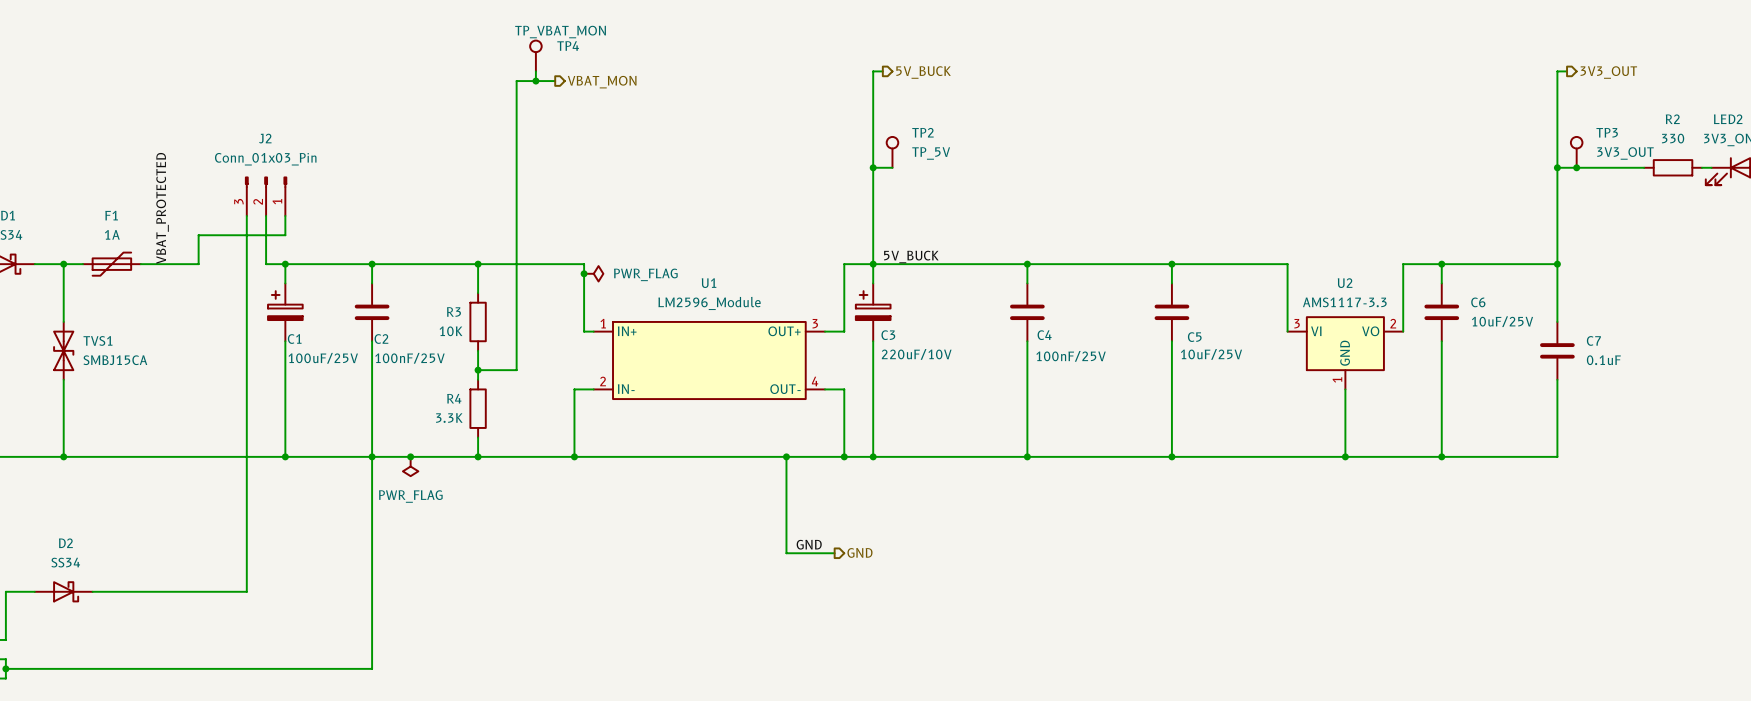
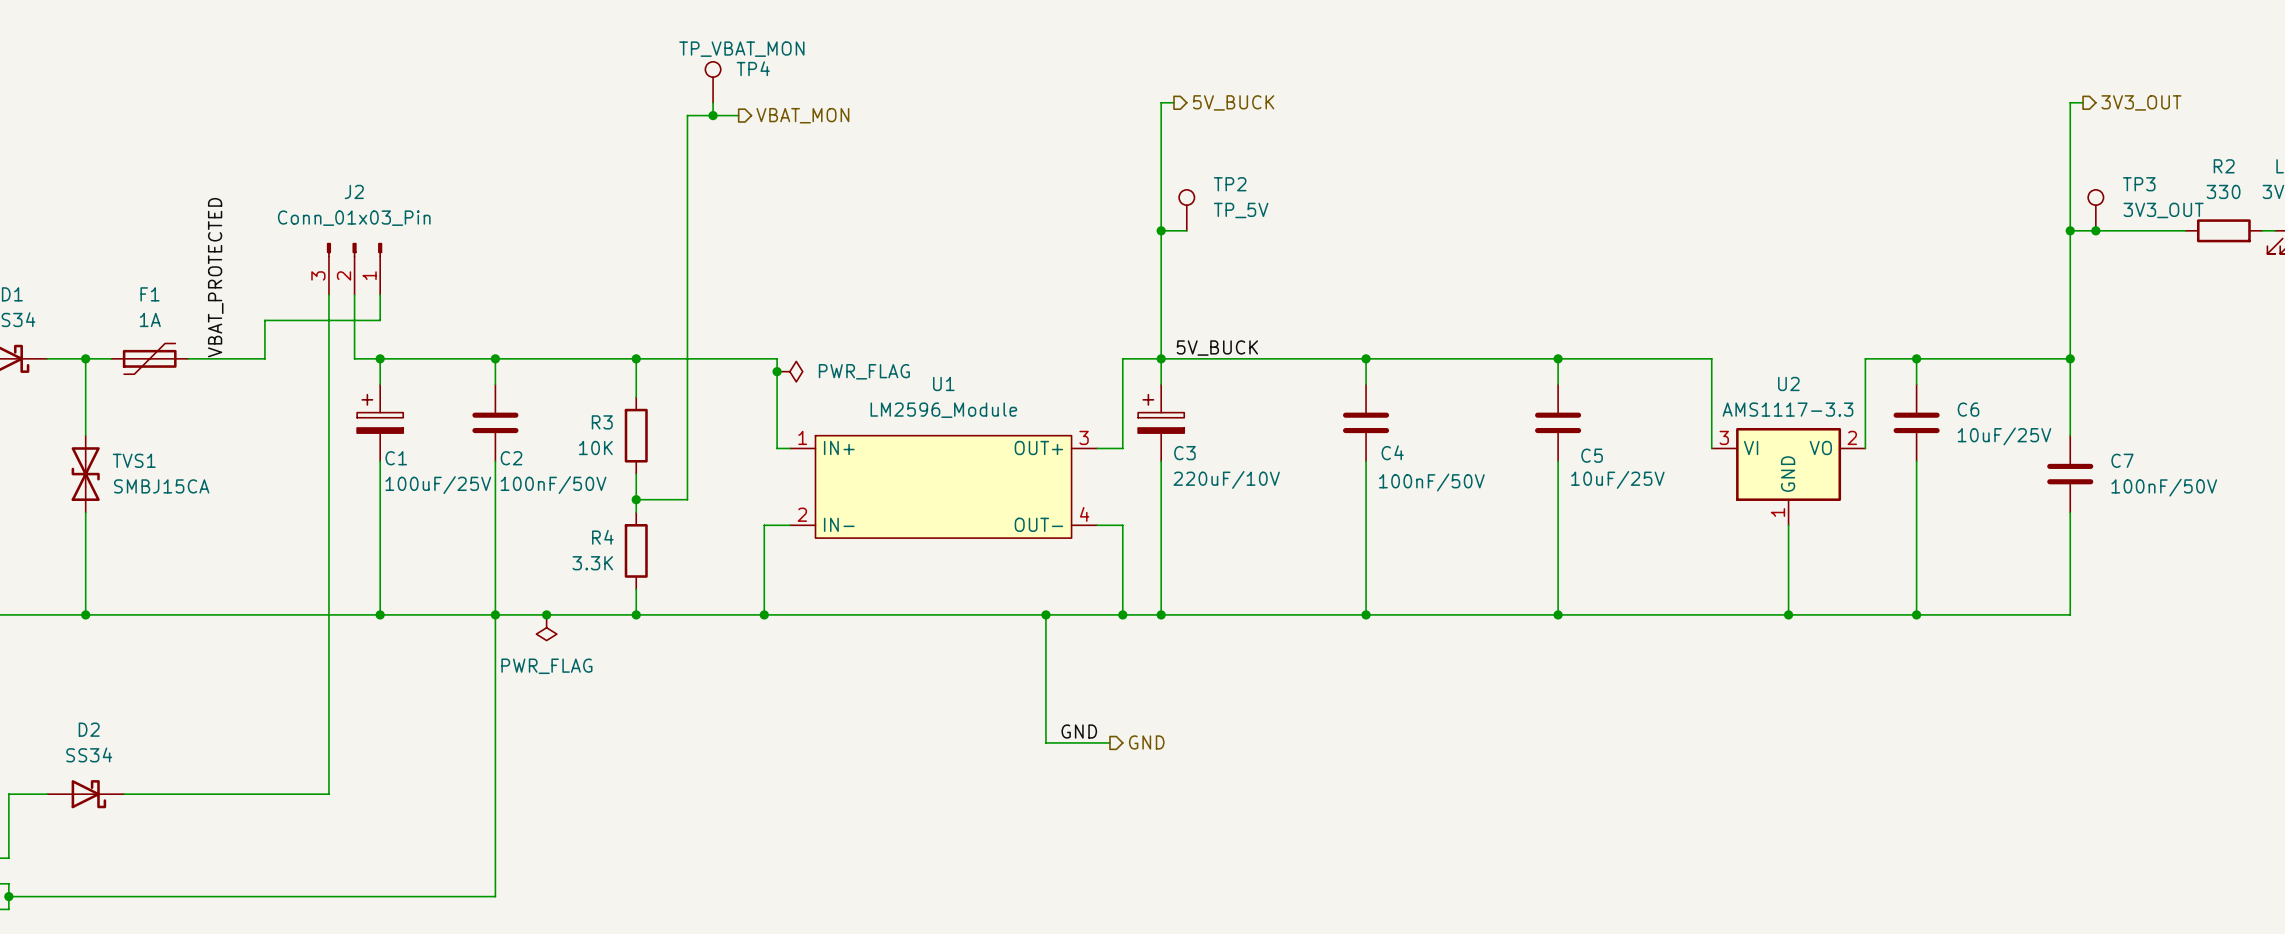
C4 value: 100nF/25V (1071, 356) -> 100nF/50V (1431, 482)
C2 value: 100nF/25V (409, 358) -> 100nF/50V (553, 485)
C7 value: 0.1uF (1603, 360) -> 100nF/50V (2164, 487)

